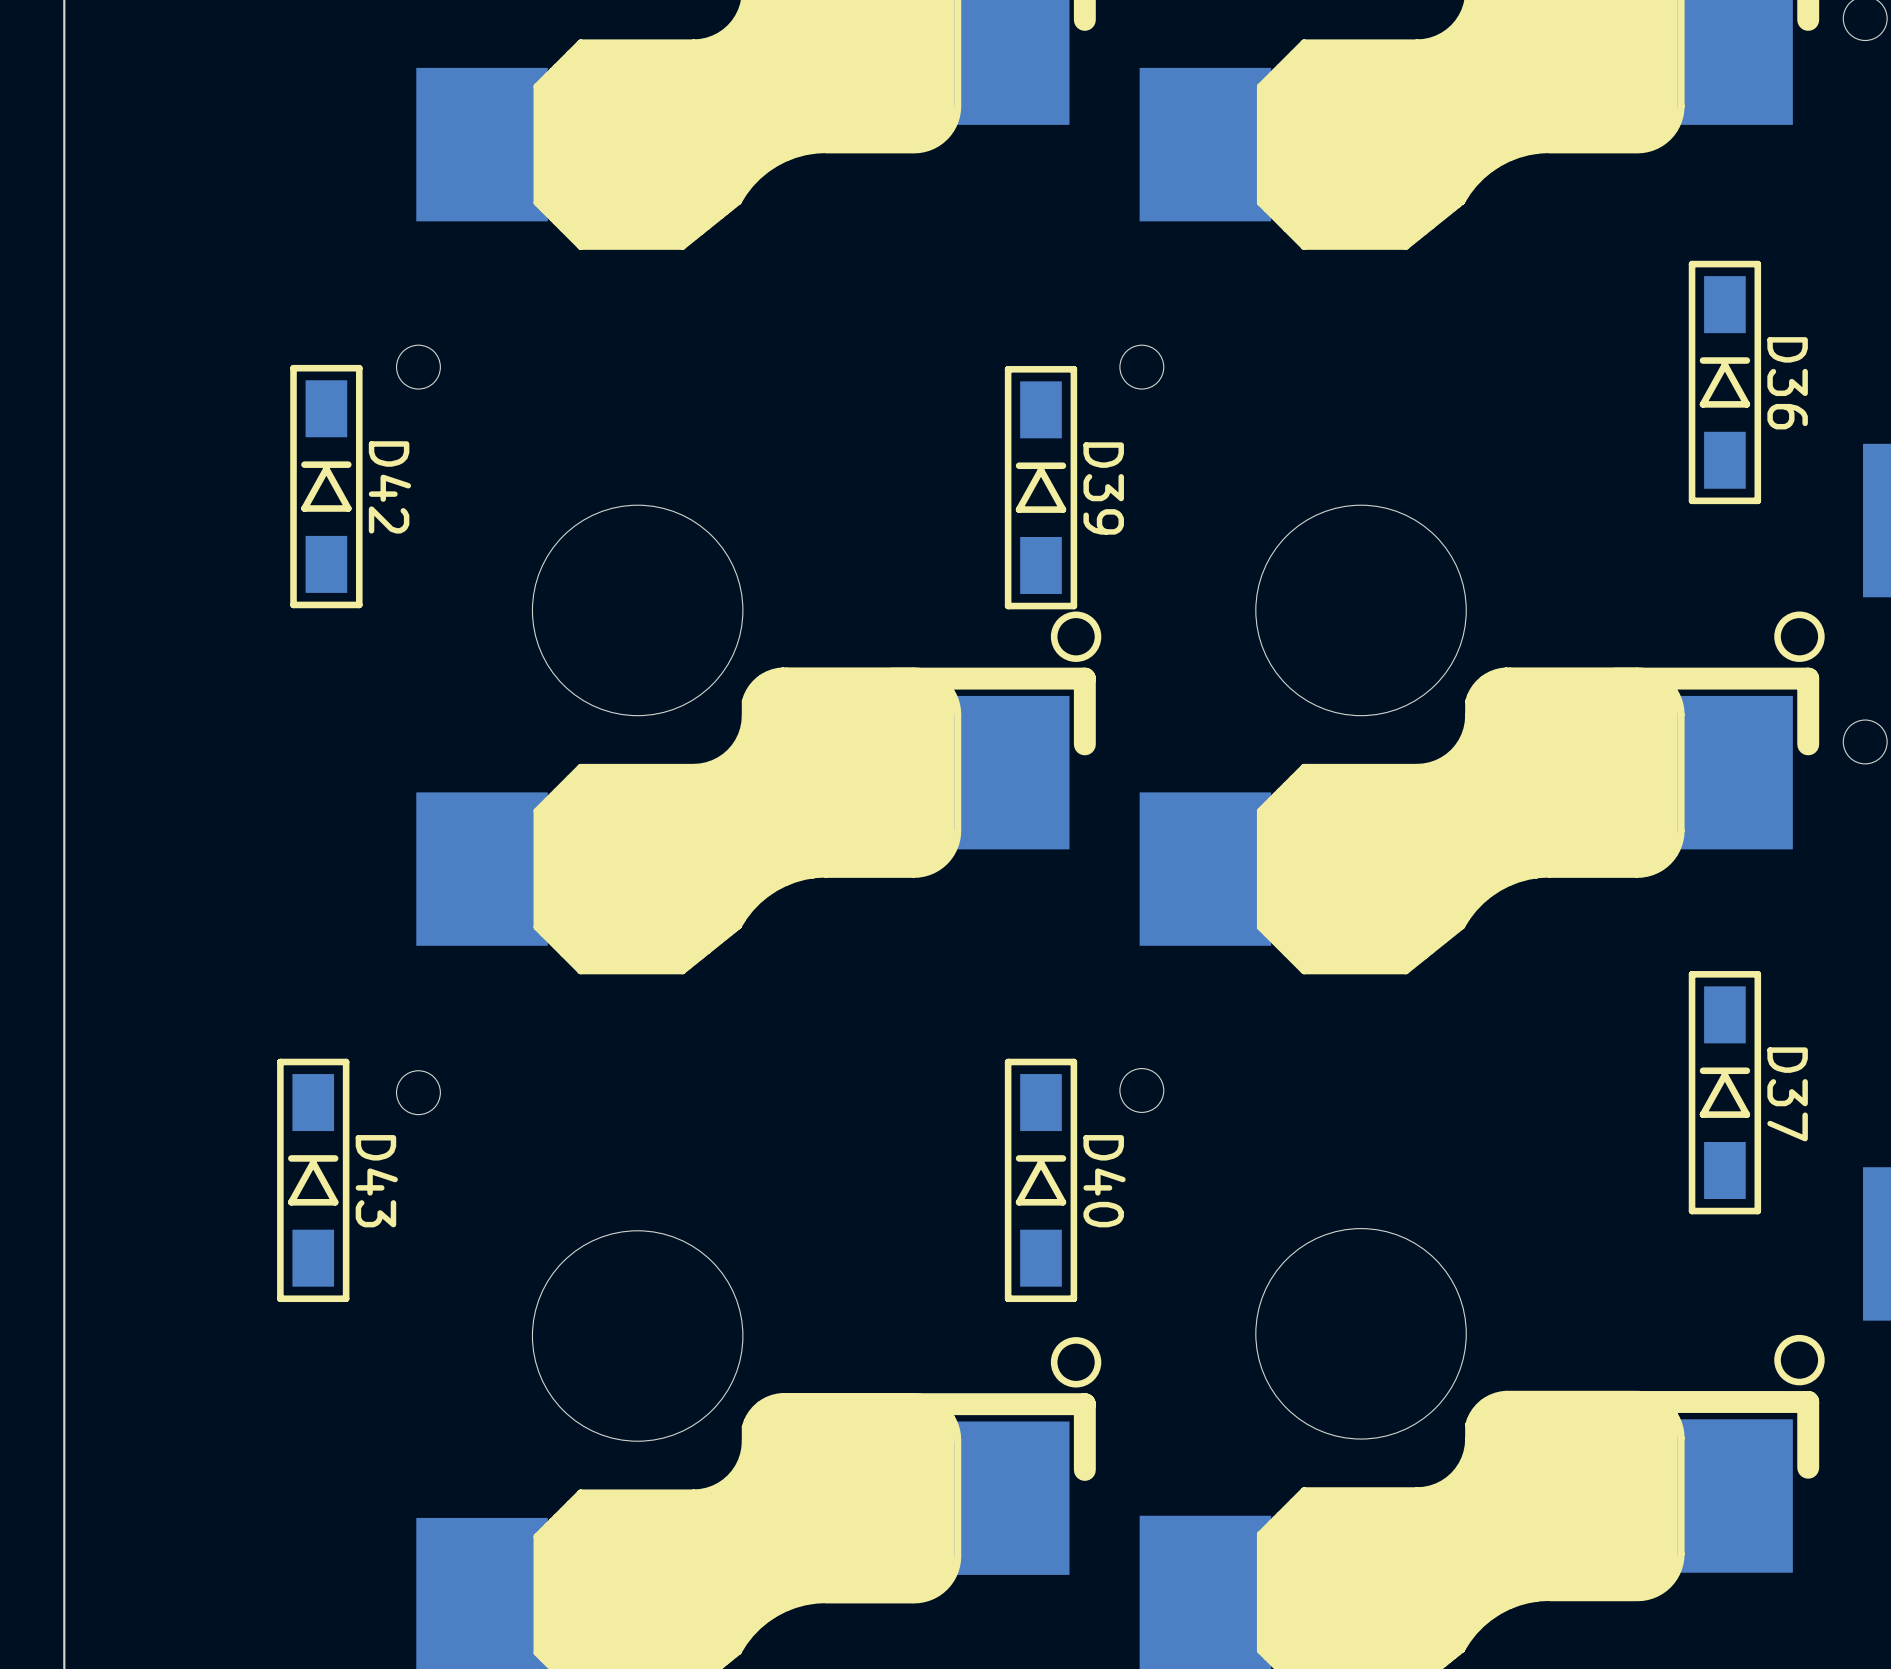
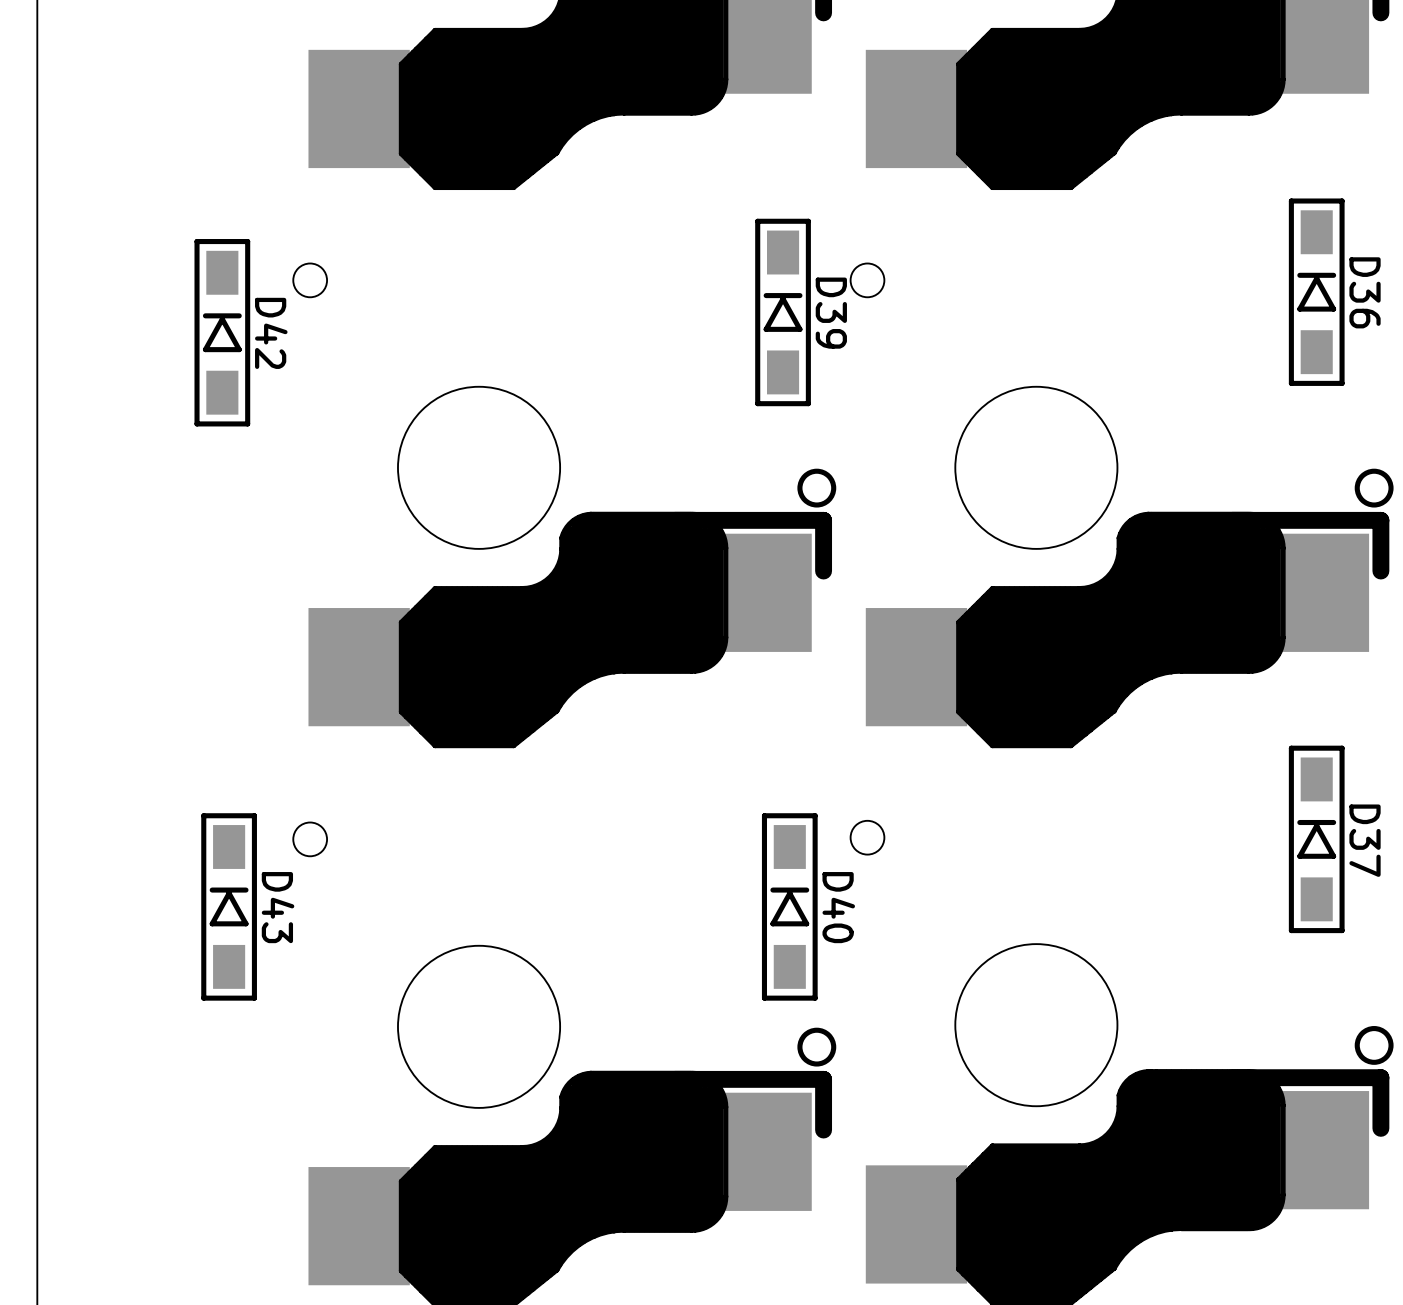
D42 position: (326, 486) -> (222, 332)
D39 position: (1041, 487) -> (783, 312)

